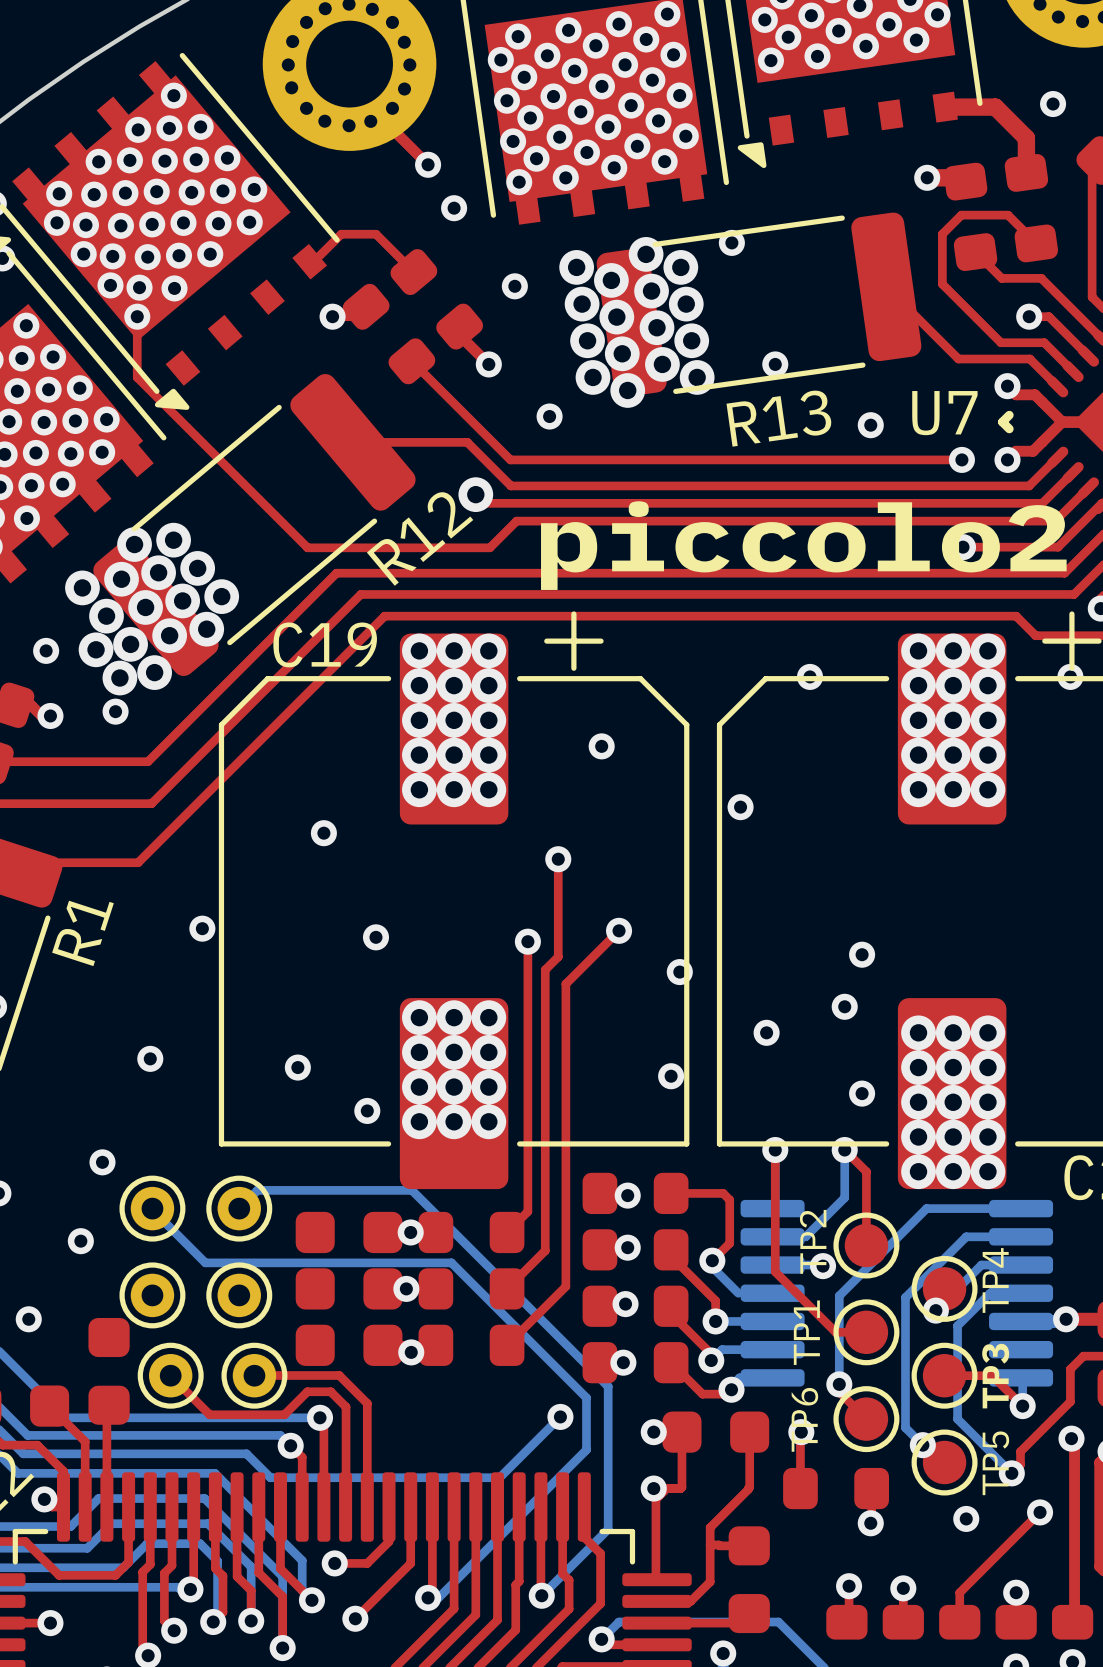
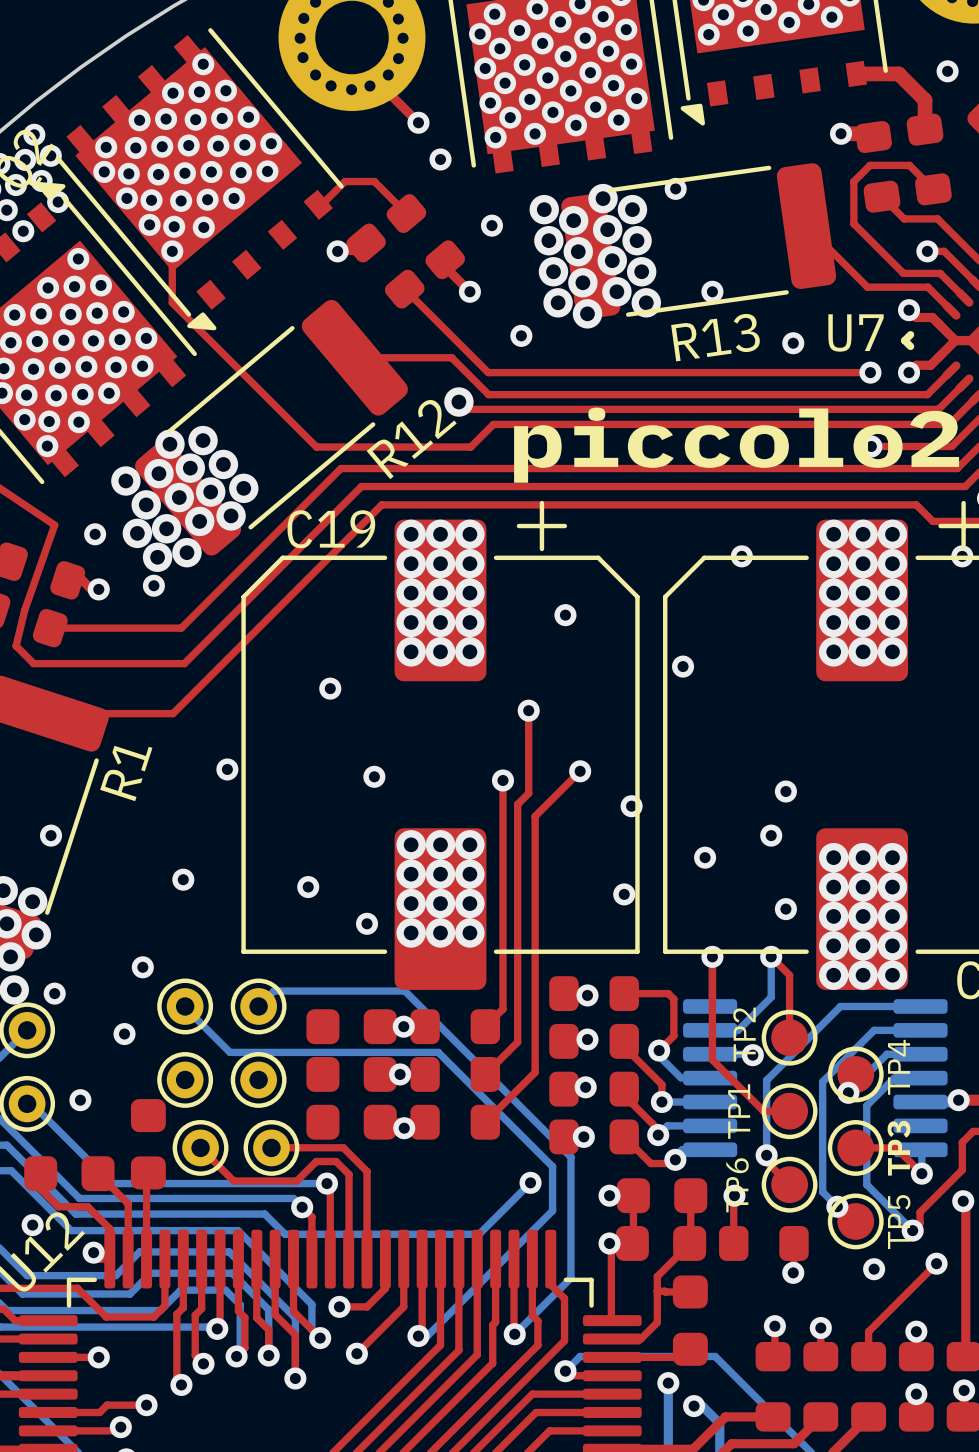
part: none -> (660, 1243)

